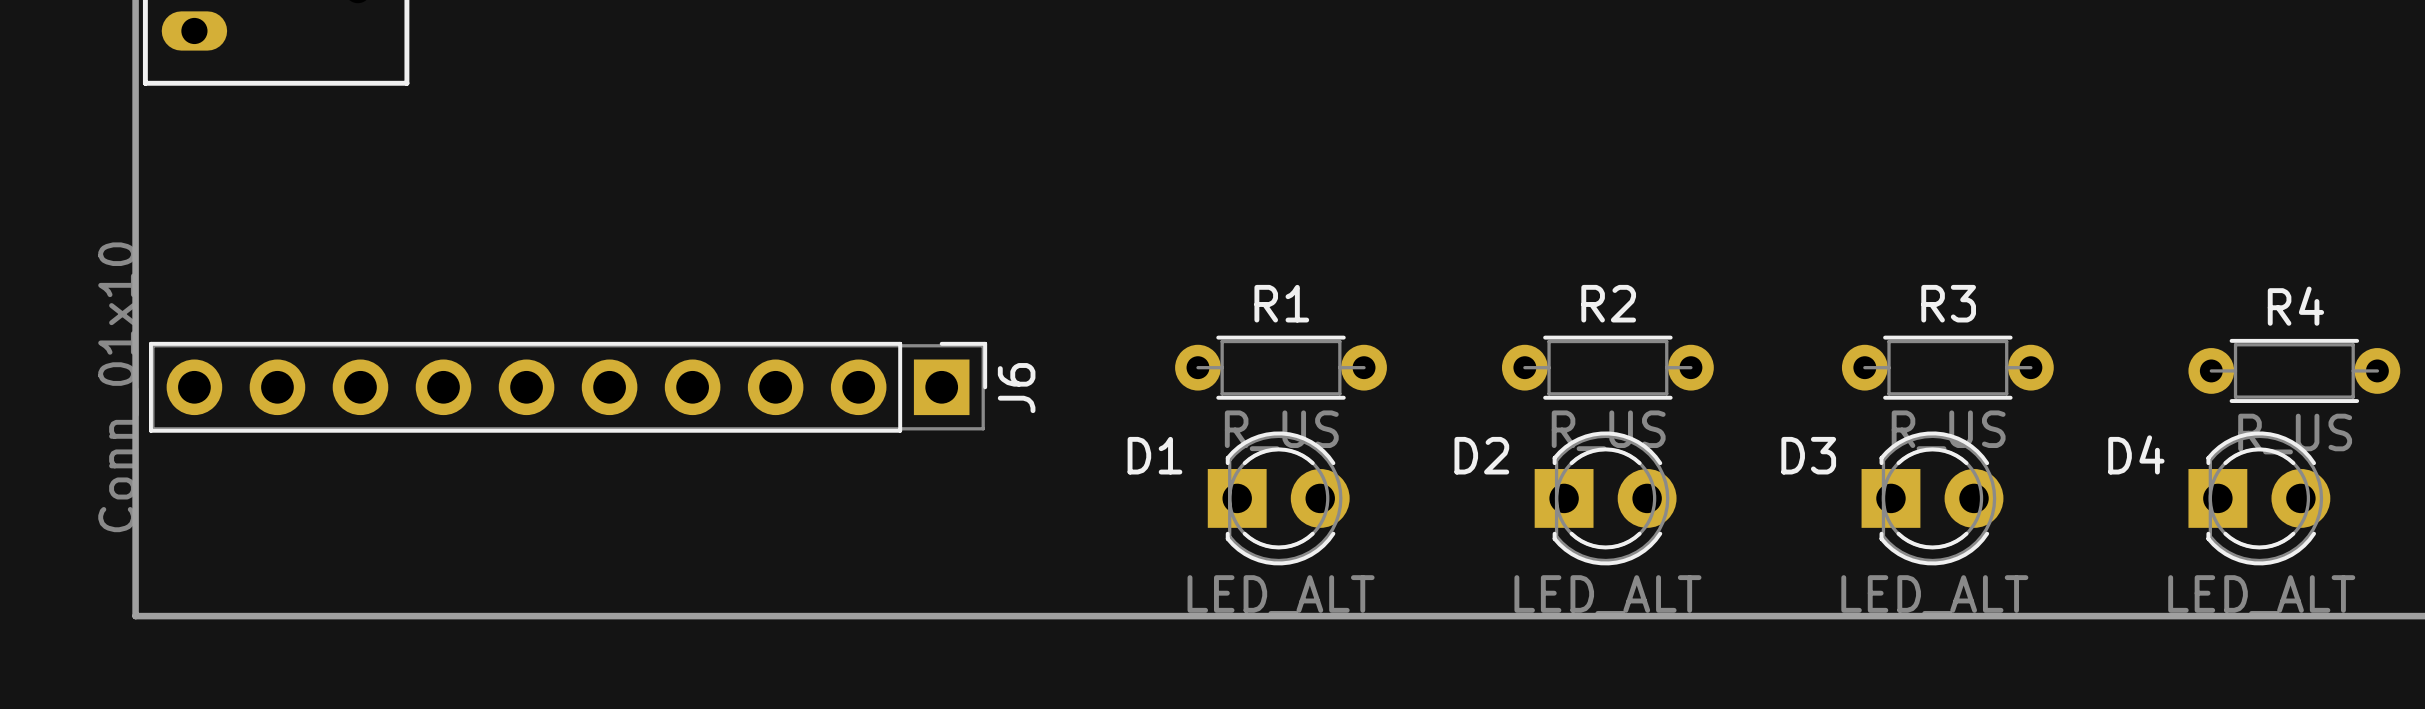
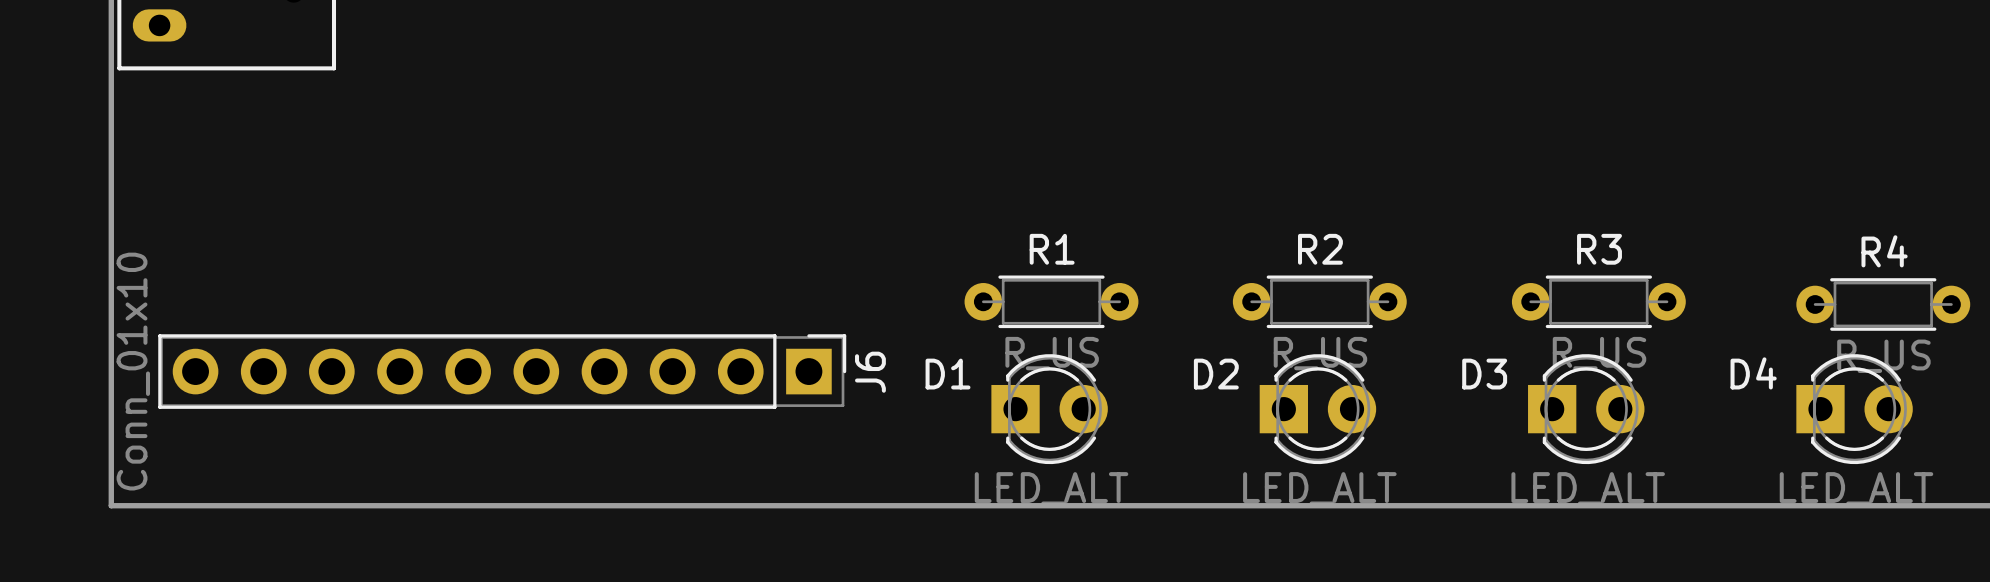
J6 position: (568, 387) -> (502, 371)

